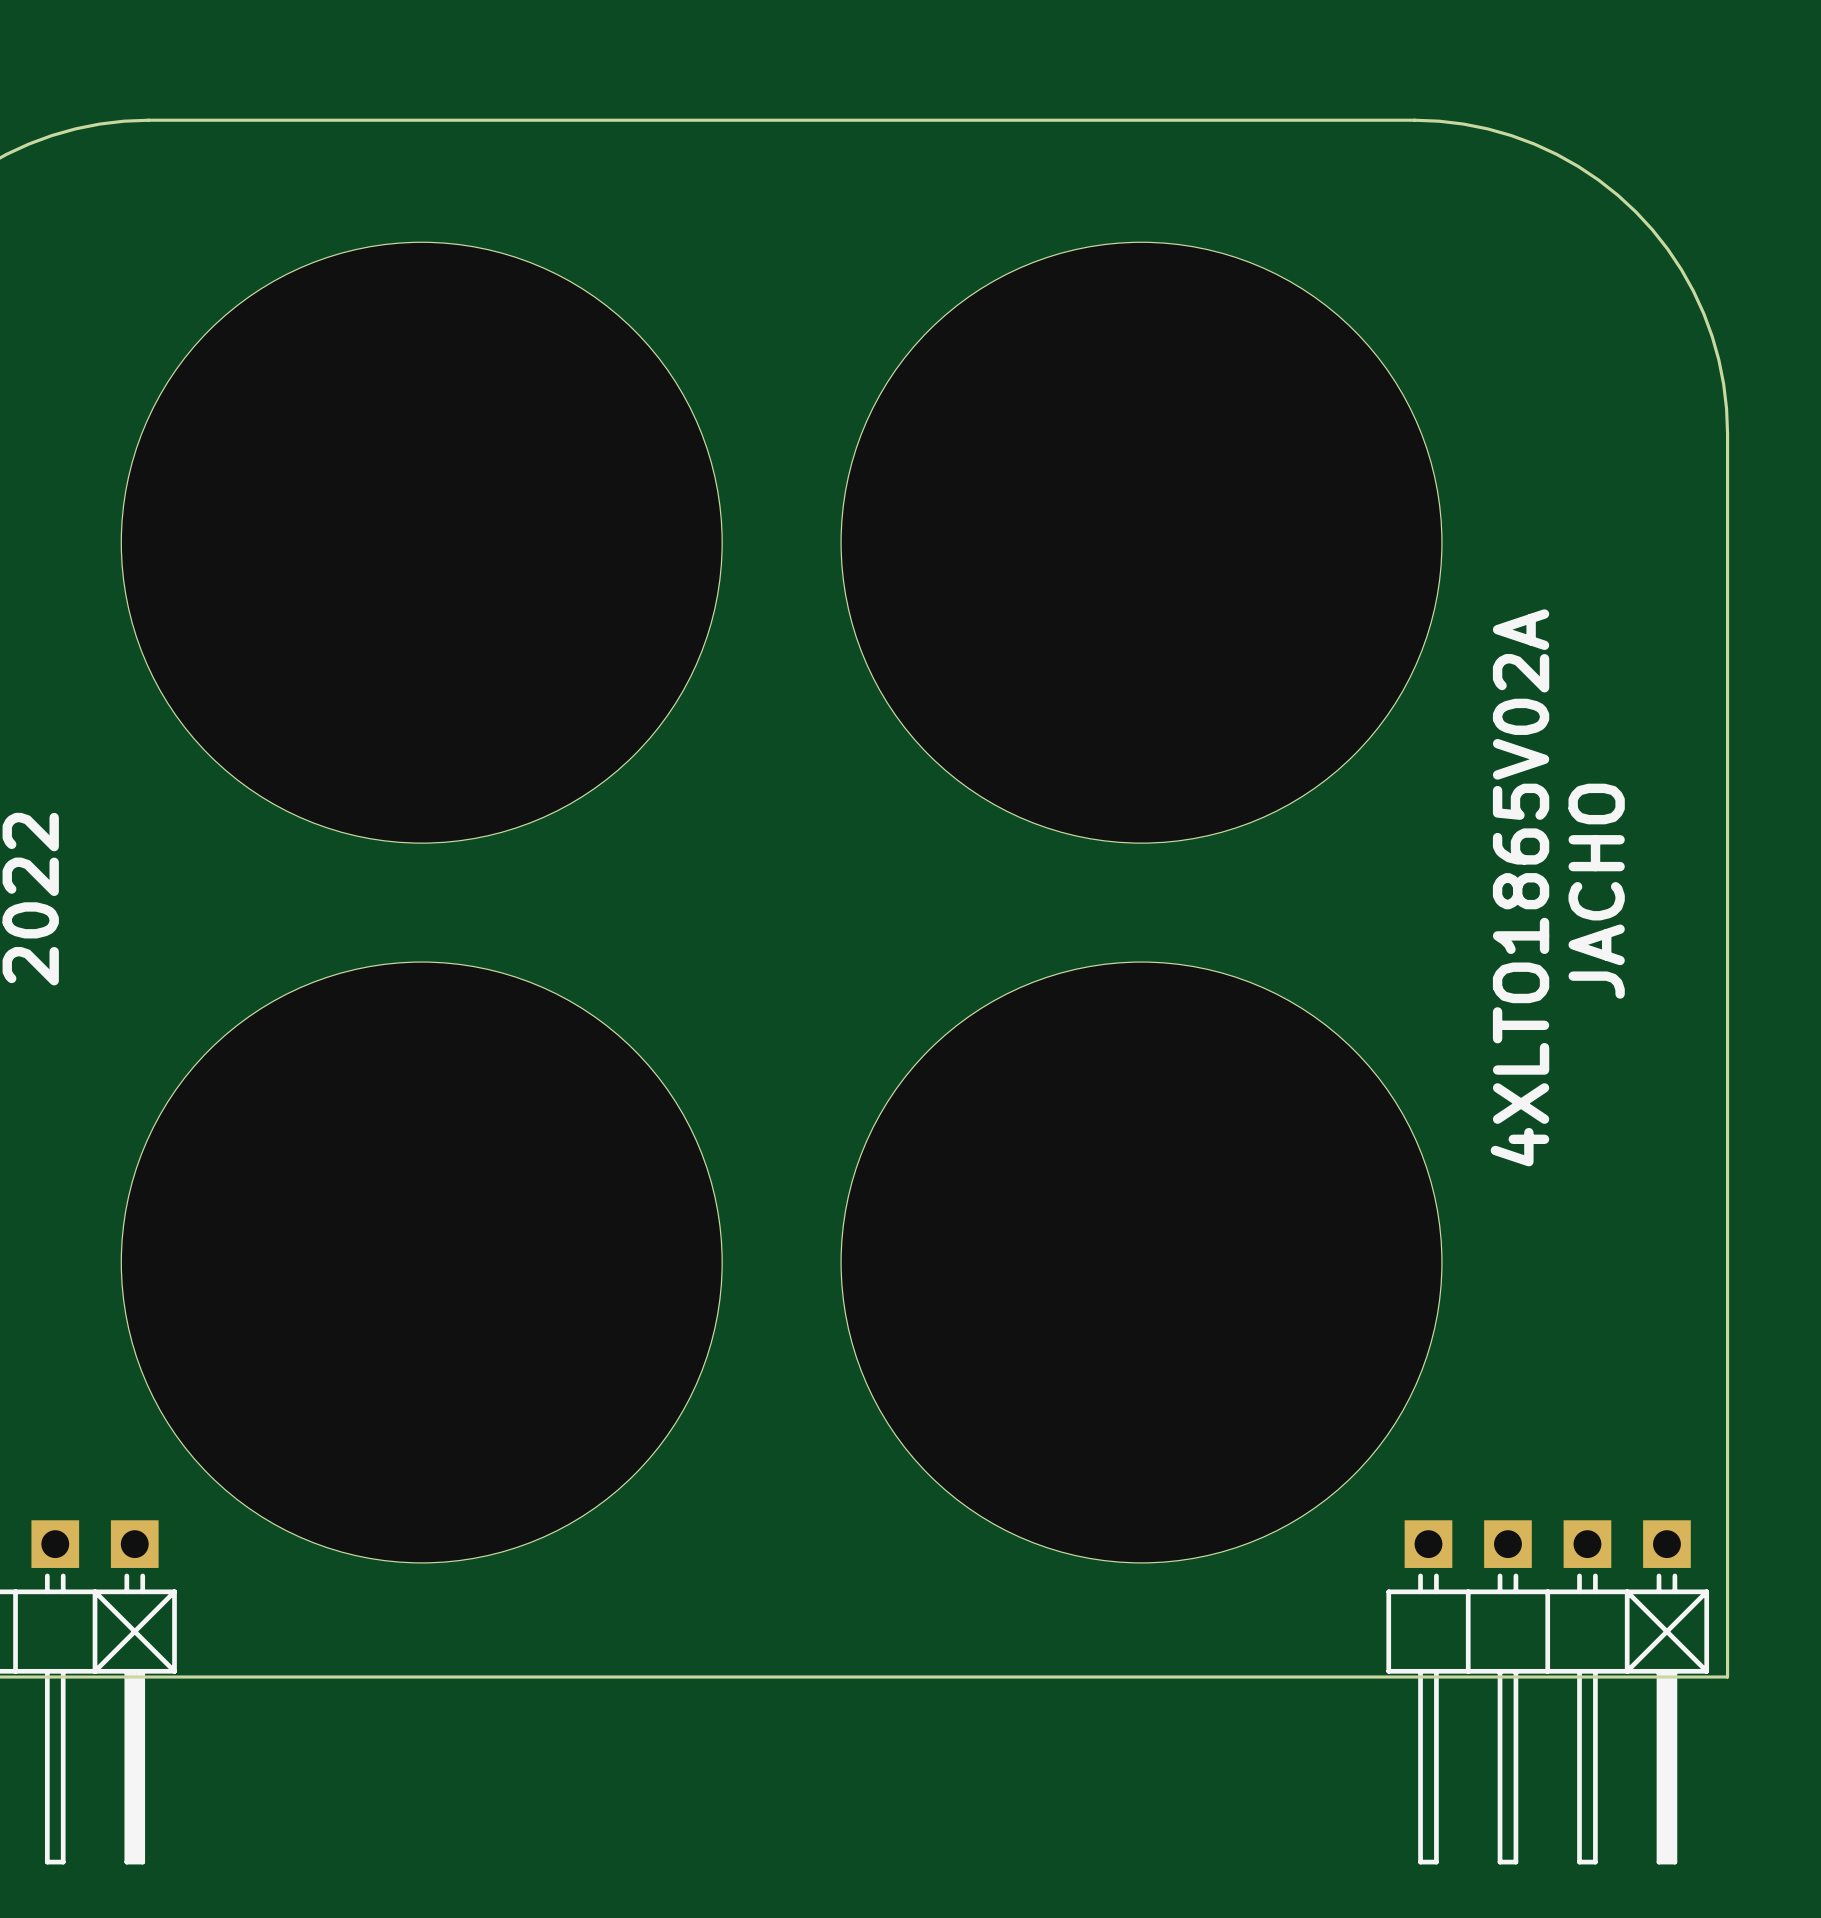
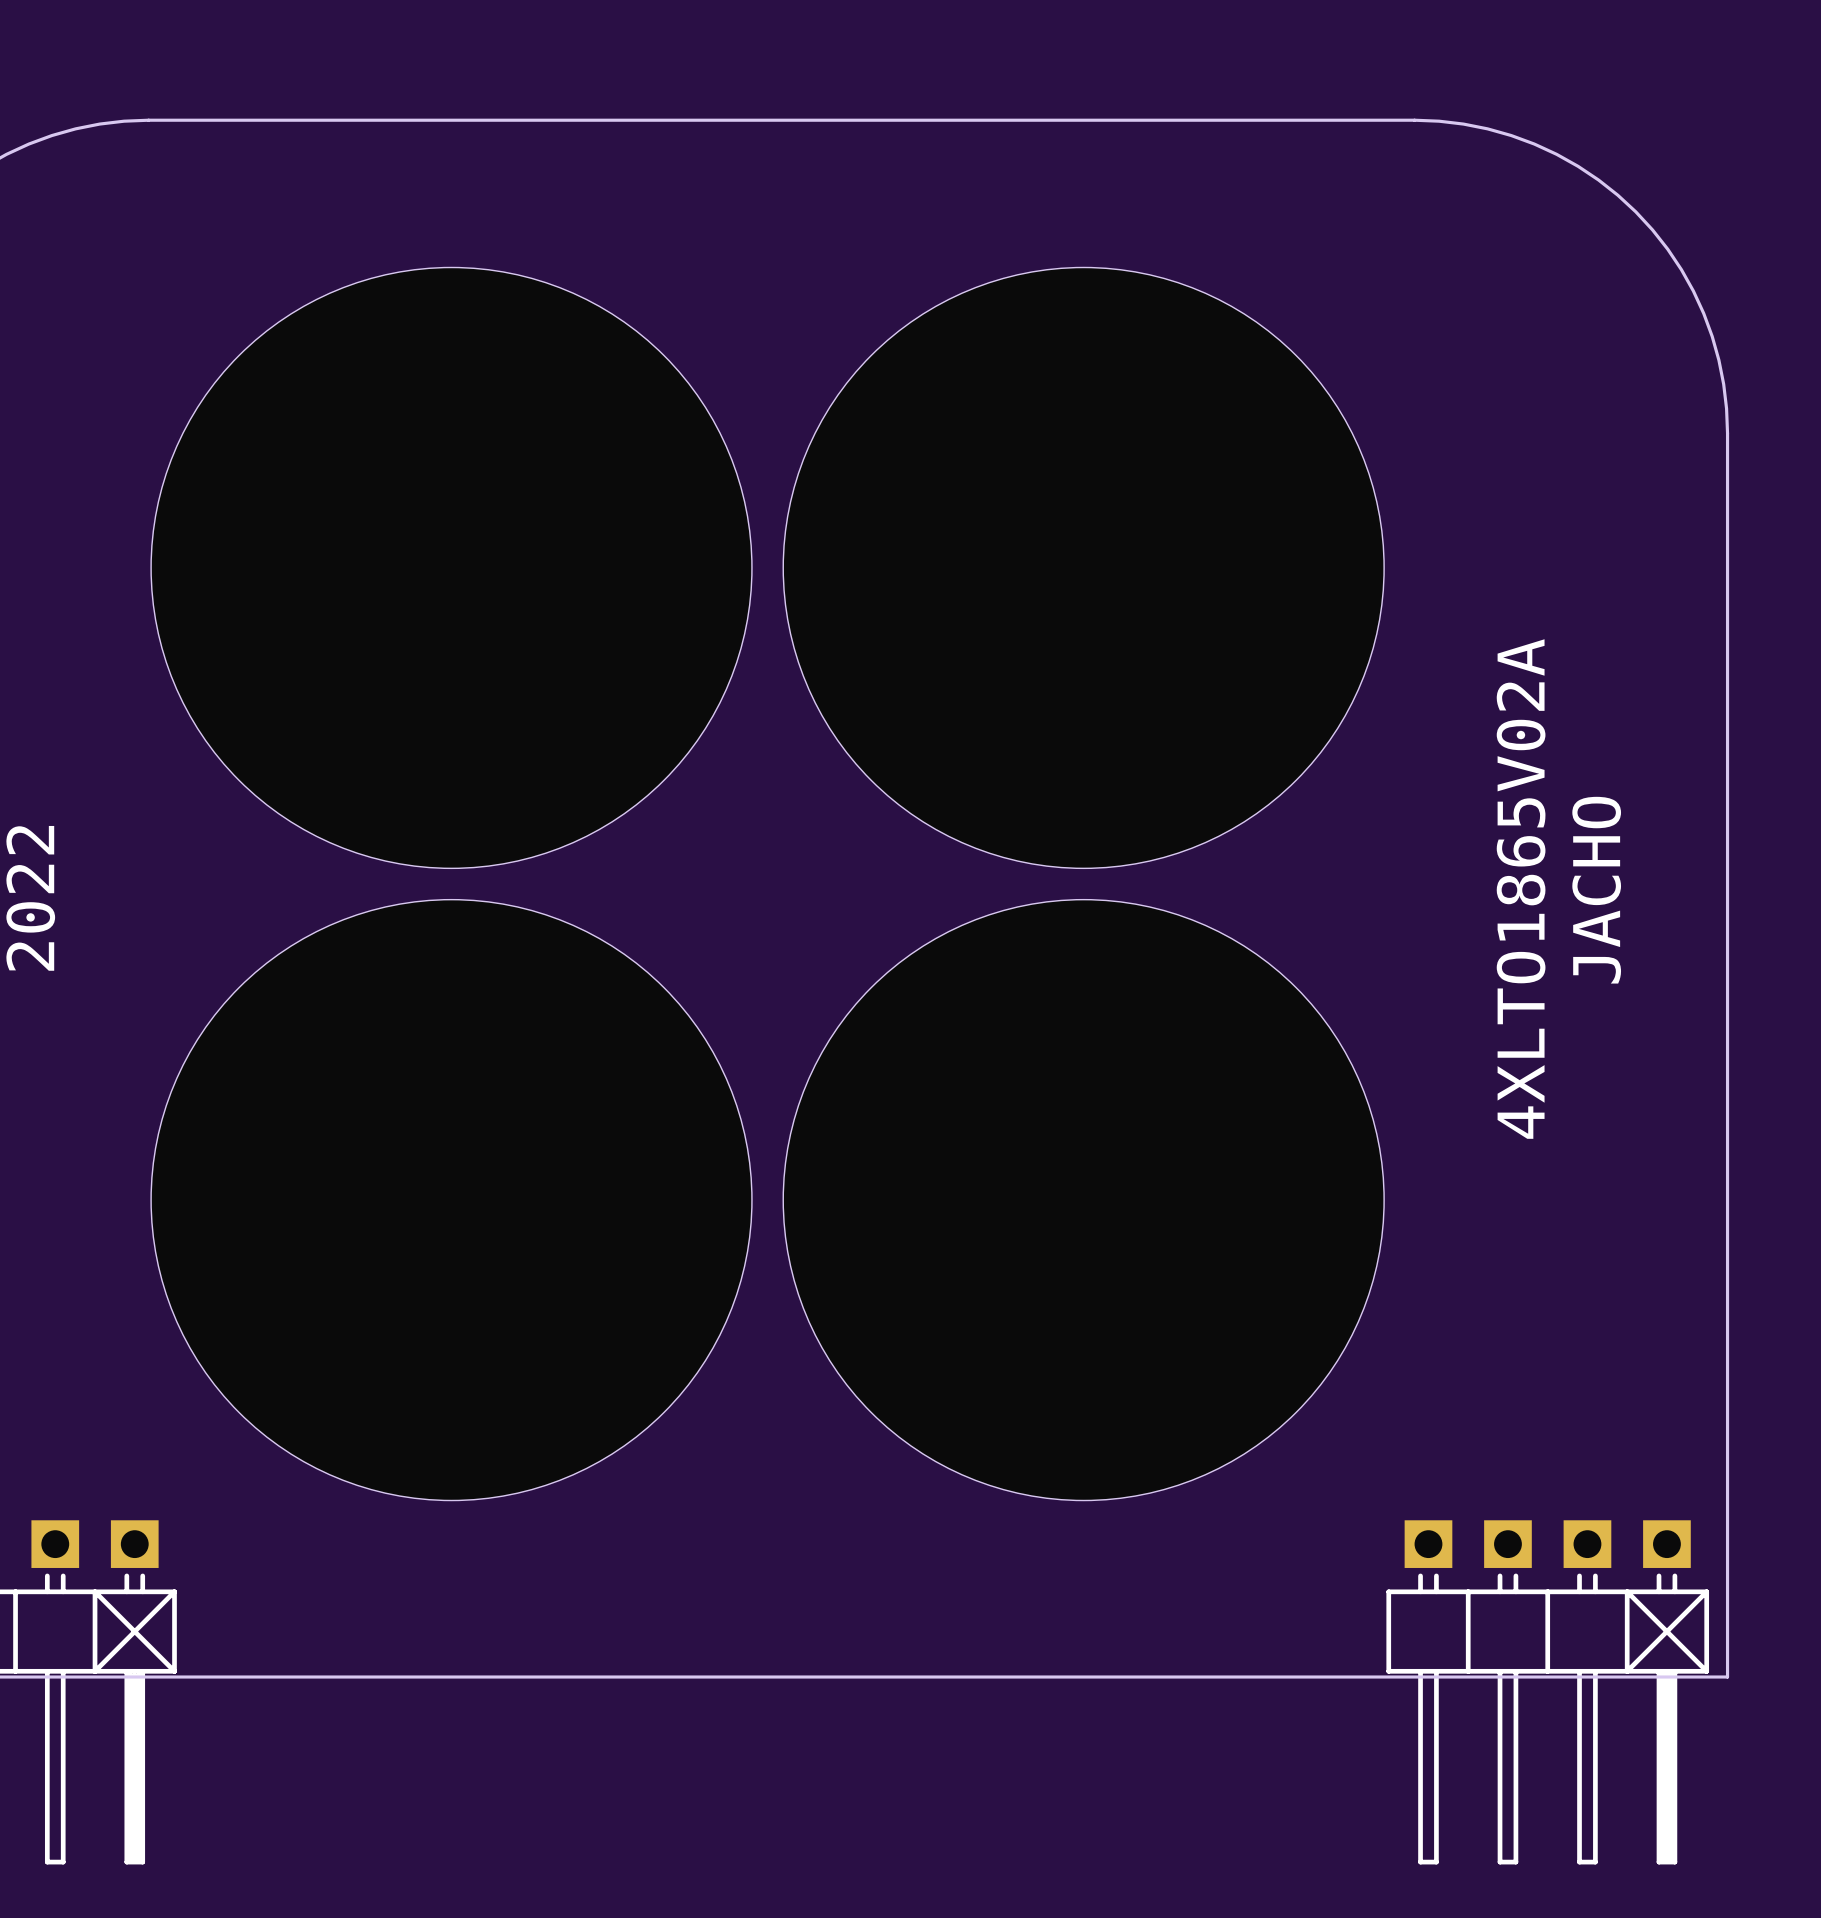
part position: (421, 542) -> (451, 567)
part position: (1141, 542) -> (1083, 567)
part position: (421, 1262) -> (451, 1200)
part position: (1141, 1262) -> (1083, 1200)

